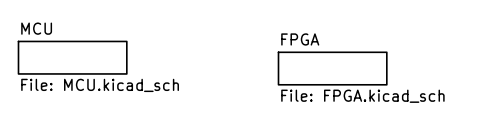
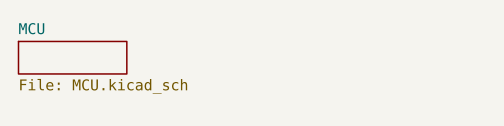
sheet FPGA: File: FPGA.kicad_sch (332, 68) -> none

